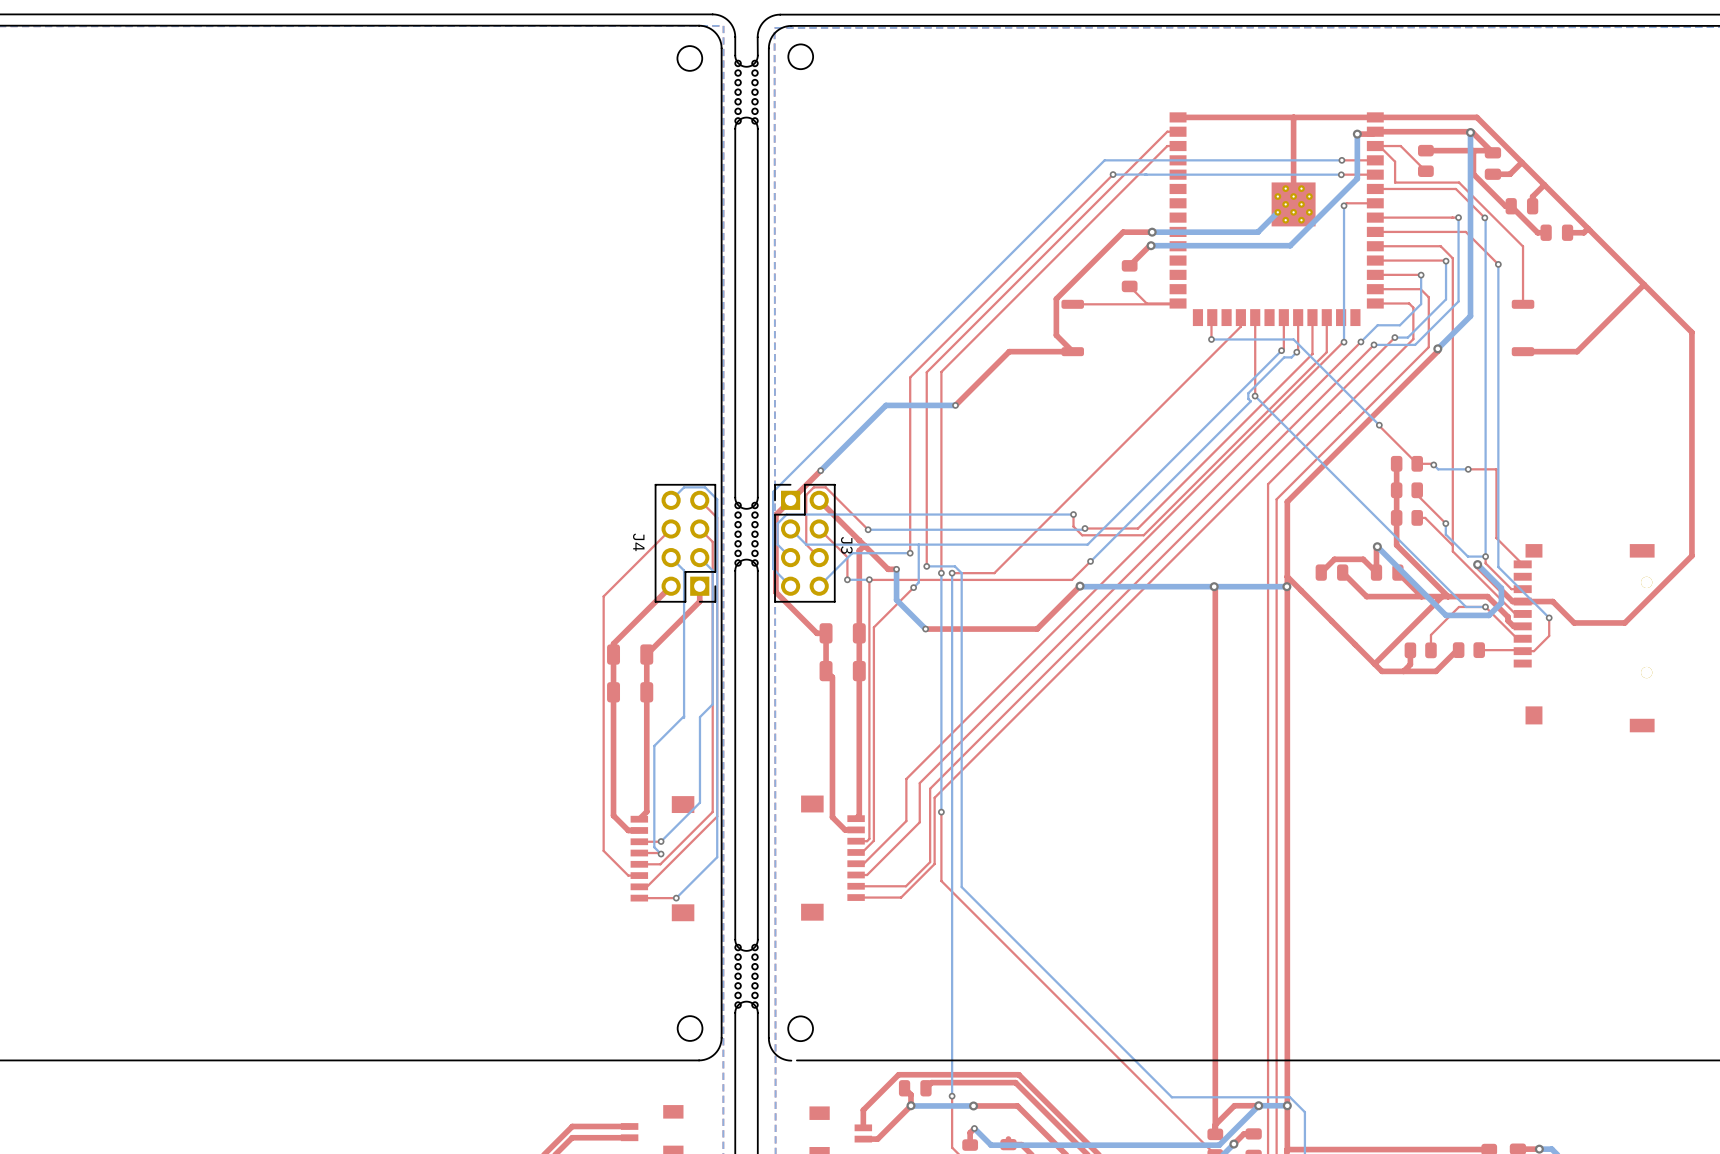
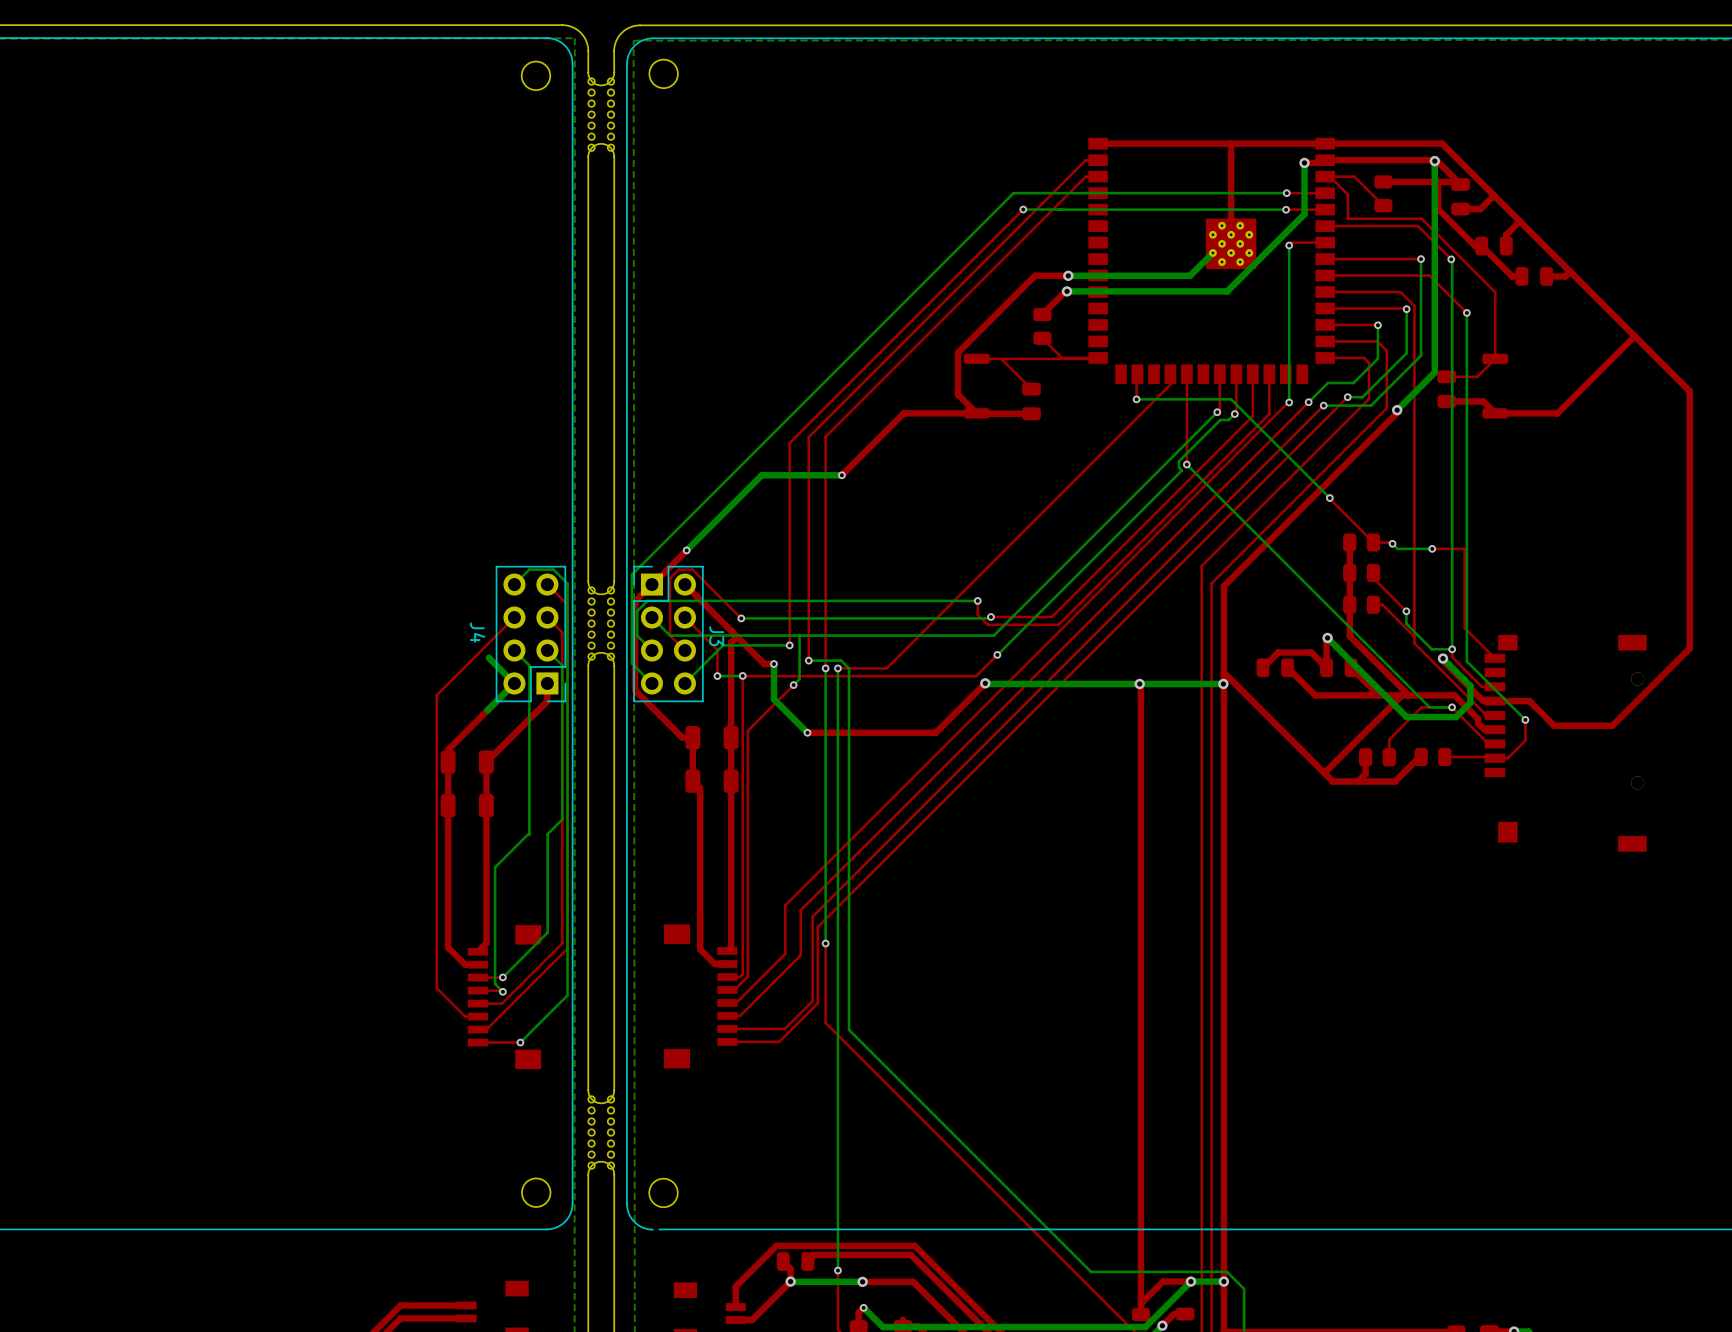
top track: none -> (1001, 358) (1031, 389)
top track: none -> (1495, 358) (1477, 376) (1446, 376)
part: none -> (1446, 389)
part: none -> (1031, 401)
top track: none -> (1446, 401) (1483, 401) (1495, 413)
top track: none -> (976, 413) (1031, 413)
bottom track: none -> (489, 658) (514, 683) (487, 710)

